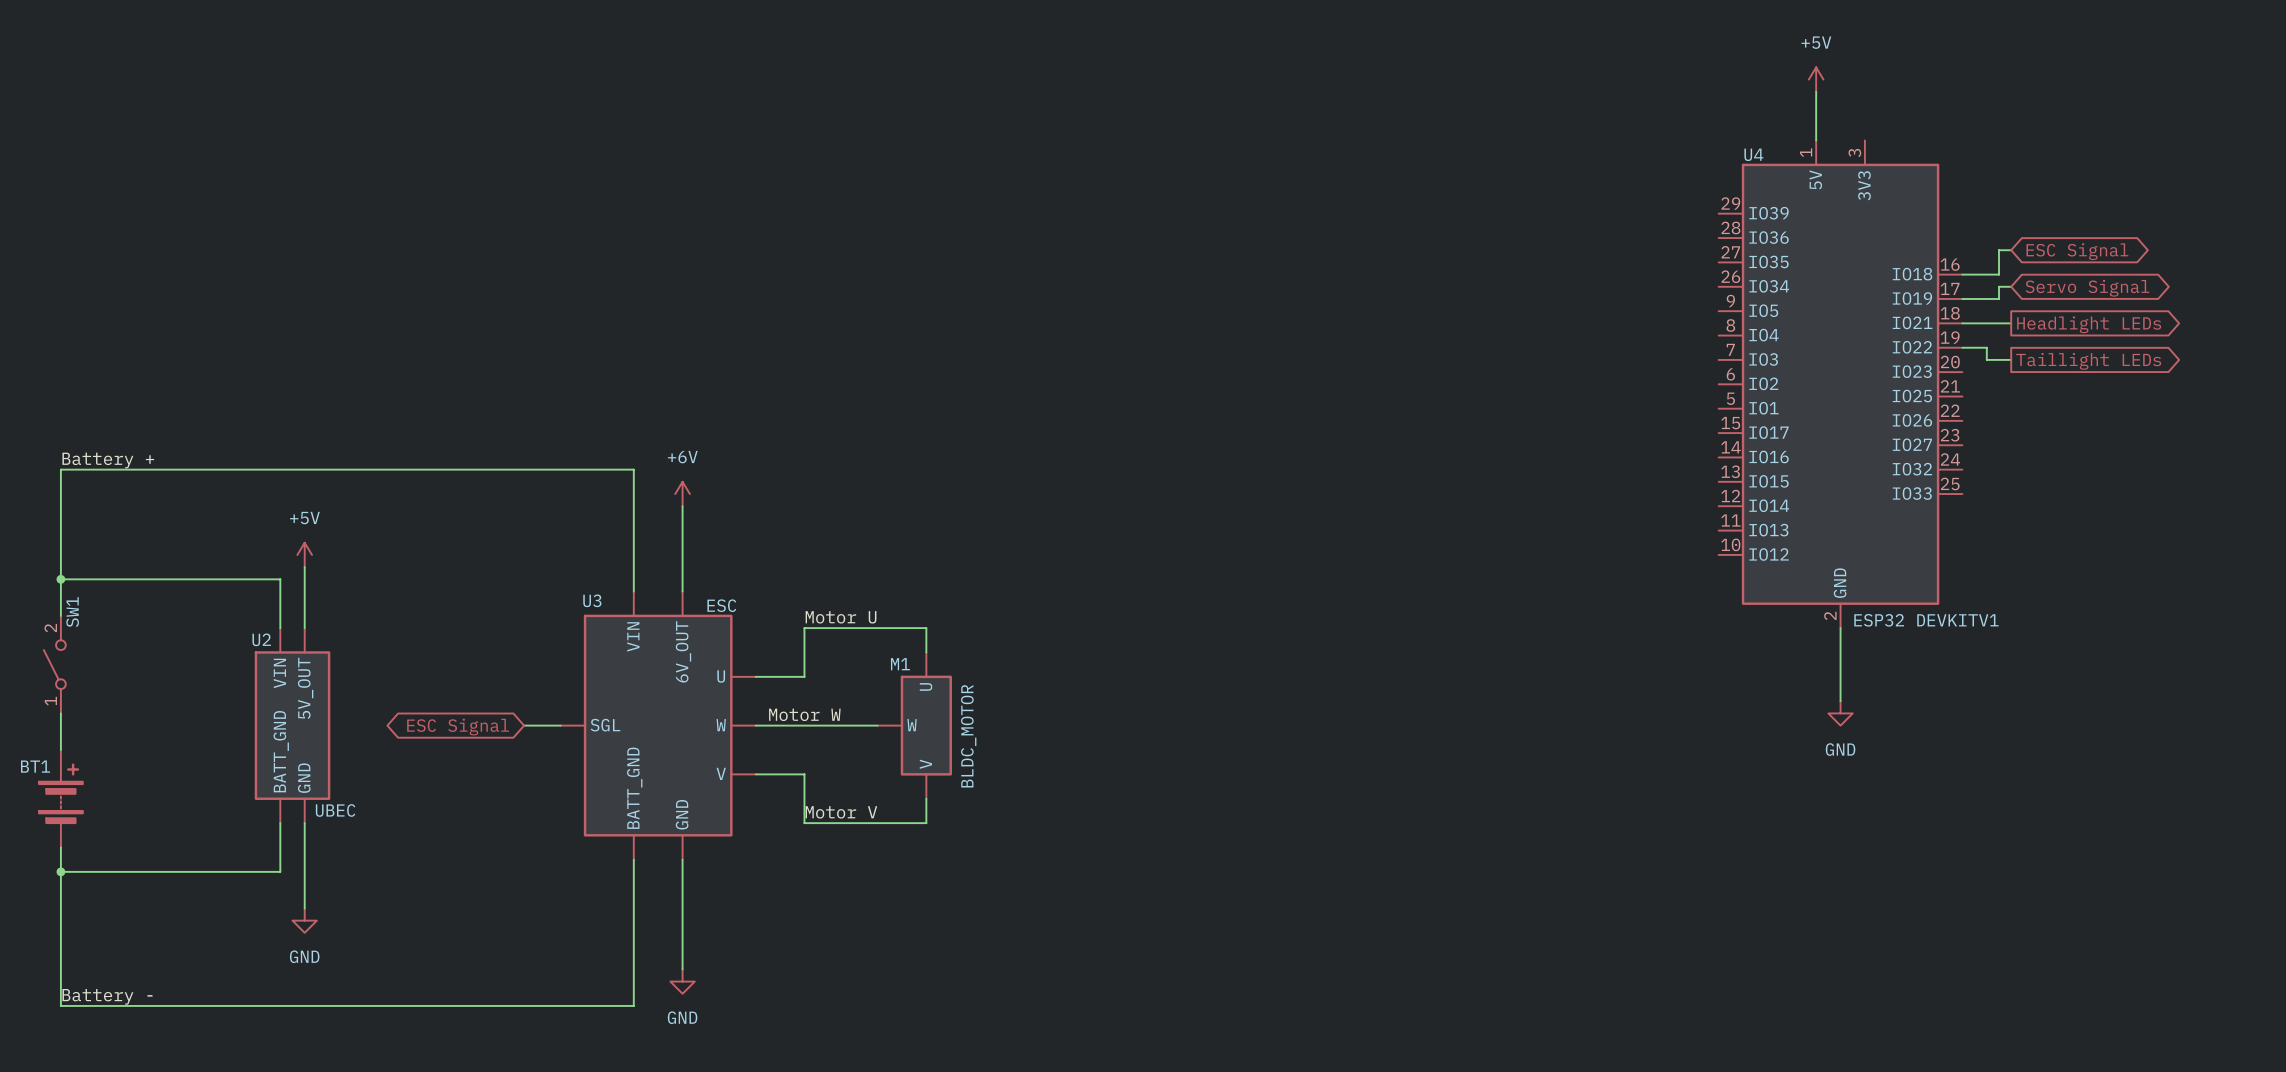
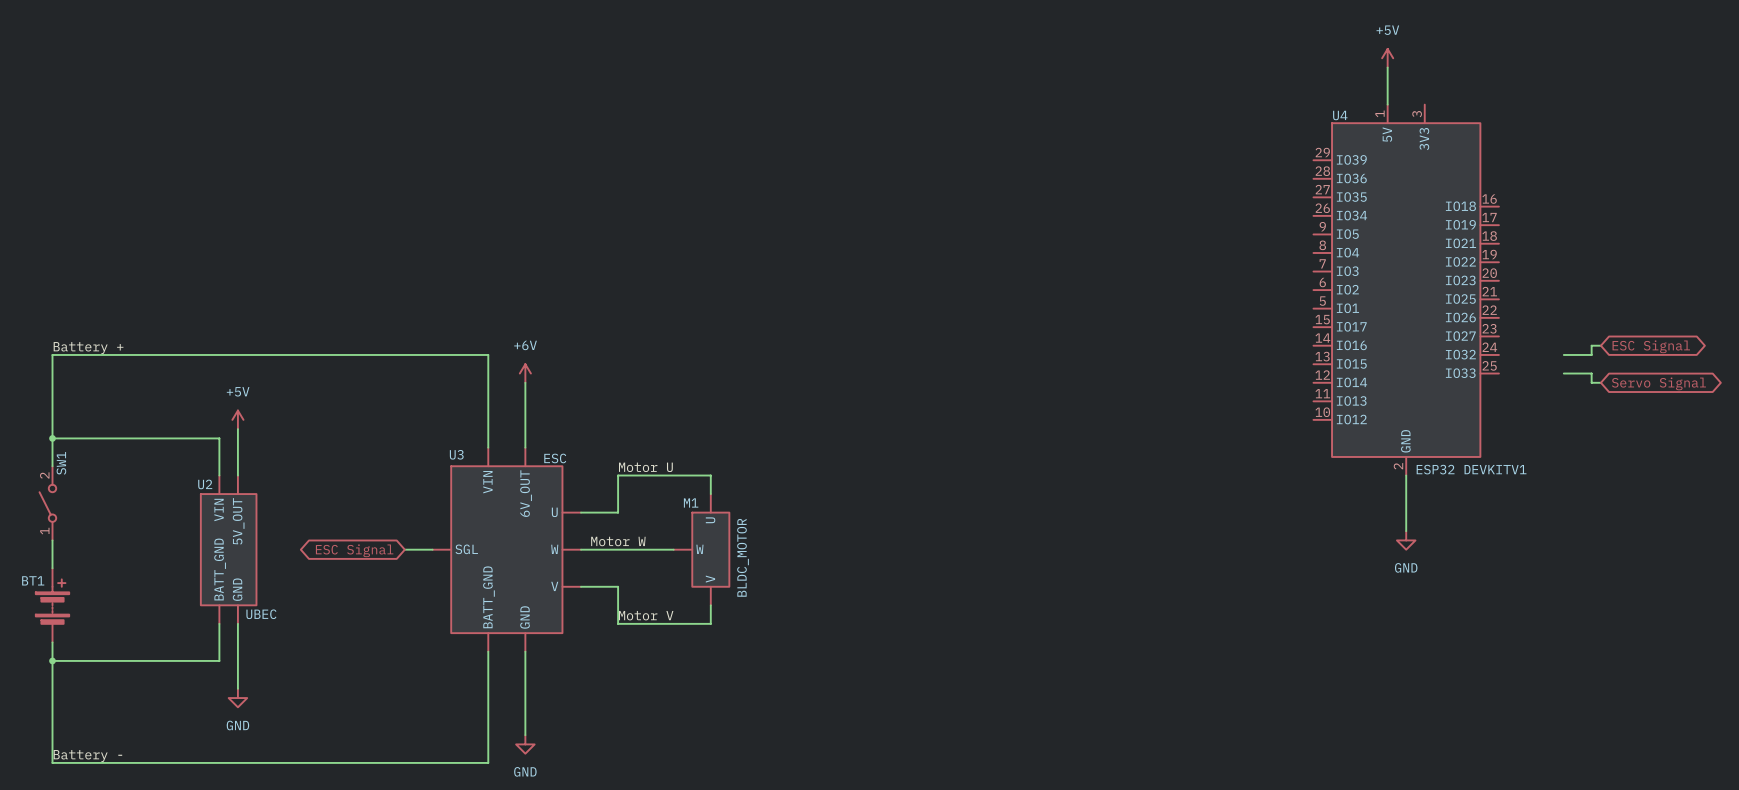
wire: (2011, 250) (1999, 250) (1999, 274) (1962, 274) -> none
global label position: ESC Signal (2077, 251) -> ESC Signal (1651, 346)
wire: (2011, 286) (1999, 286) (1999, 298) (1962, 298) -> (1600, 345) (1591, 345) (1591, 354) (1563, 354)
global label position: Servo Signal (2087, 288) -> Servo Signal (1658, 383)
wire: (1962, 323) (2011, 323) -> none
global label: Headlight LEDs (2089, 324) -> none
wire: (1962, 347) (1986, 347) (1986, 359) (2011, 359) -> none
global label: Taillight LEDs (2088, 361) -> none
wire: none -> (1563, 373) (1591, 373) (1591, 382) (1600, 382)

